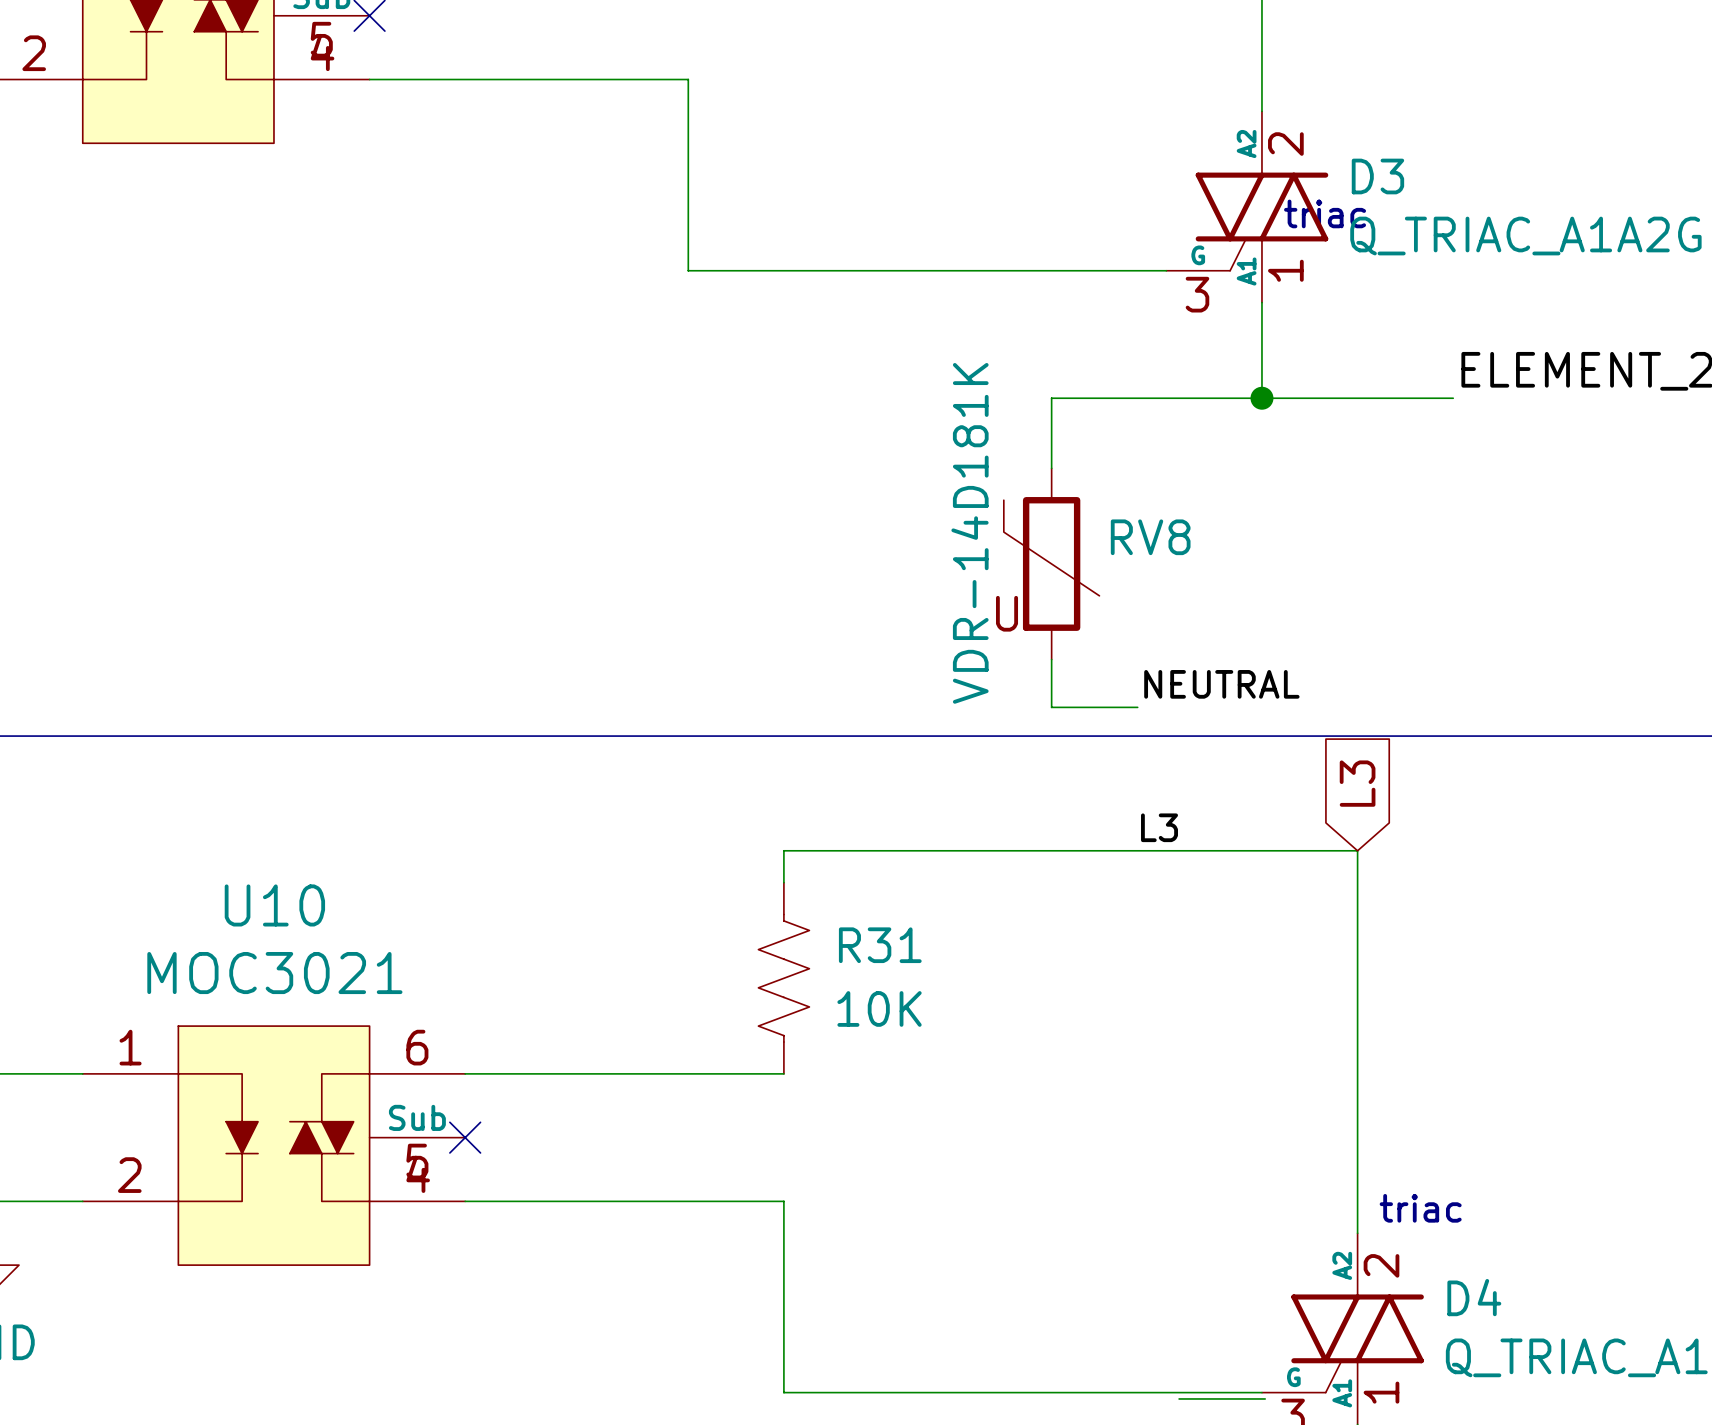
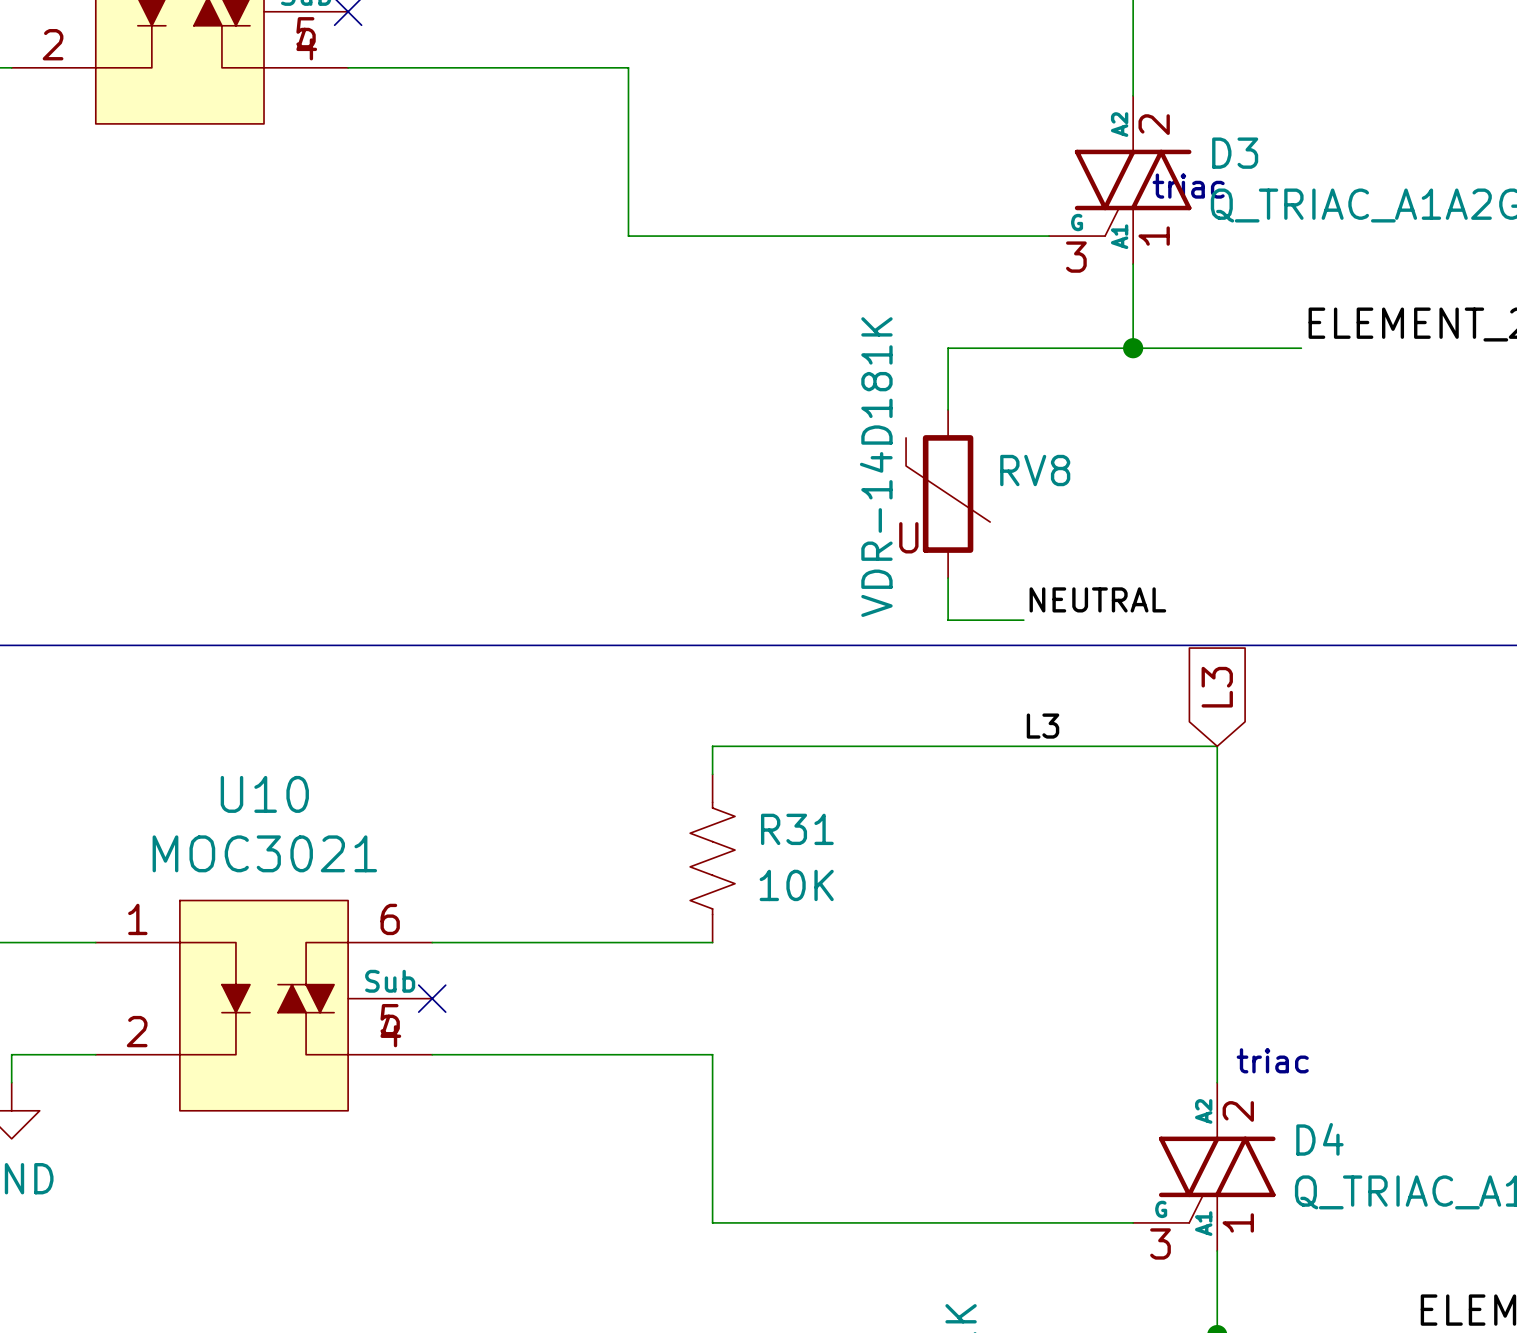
wire: (1179, 1398) (1265, 1398) -> none

